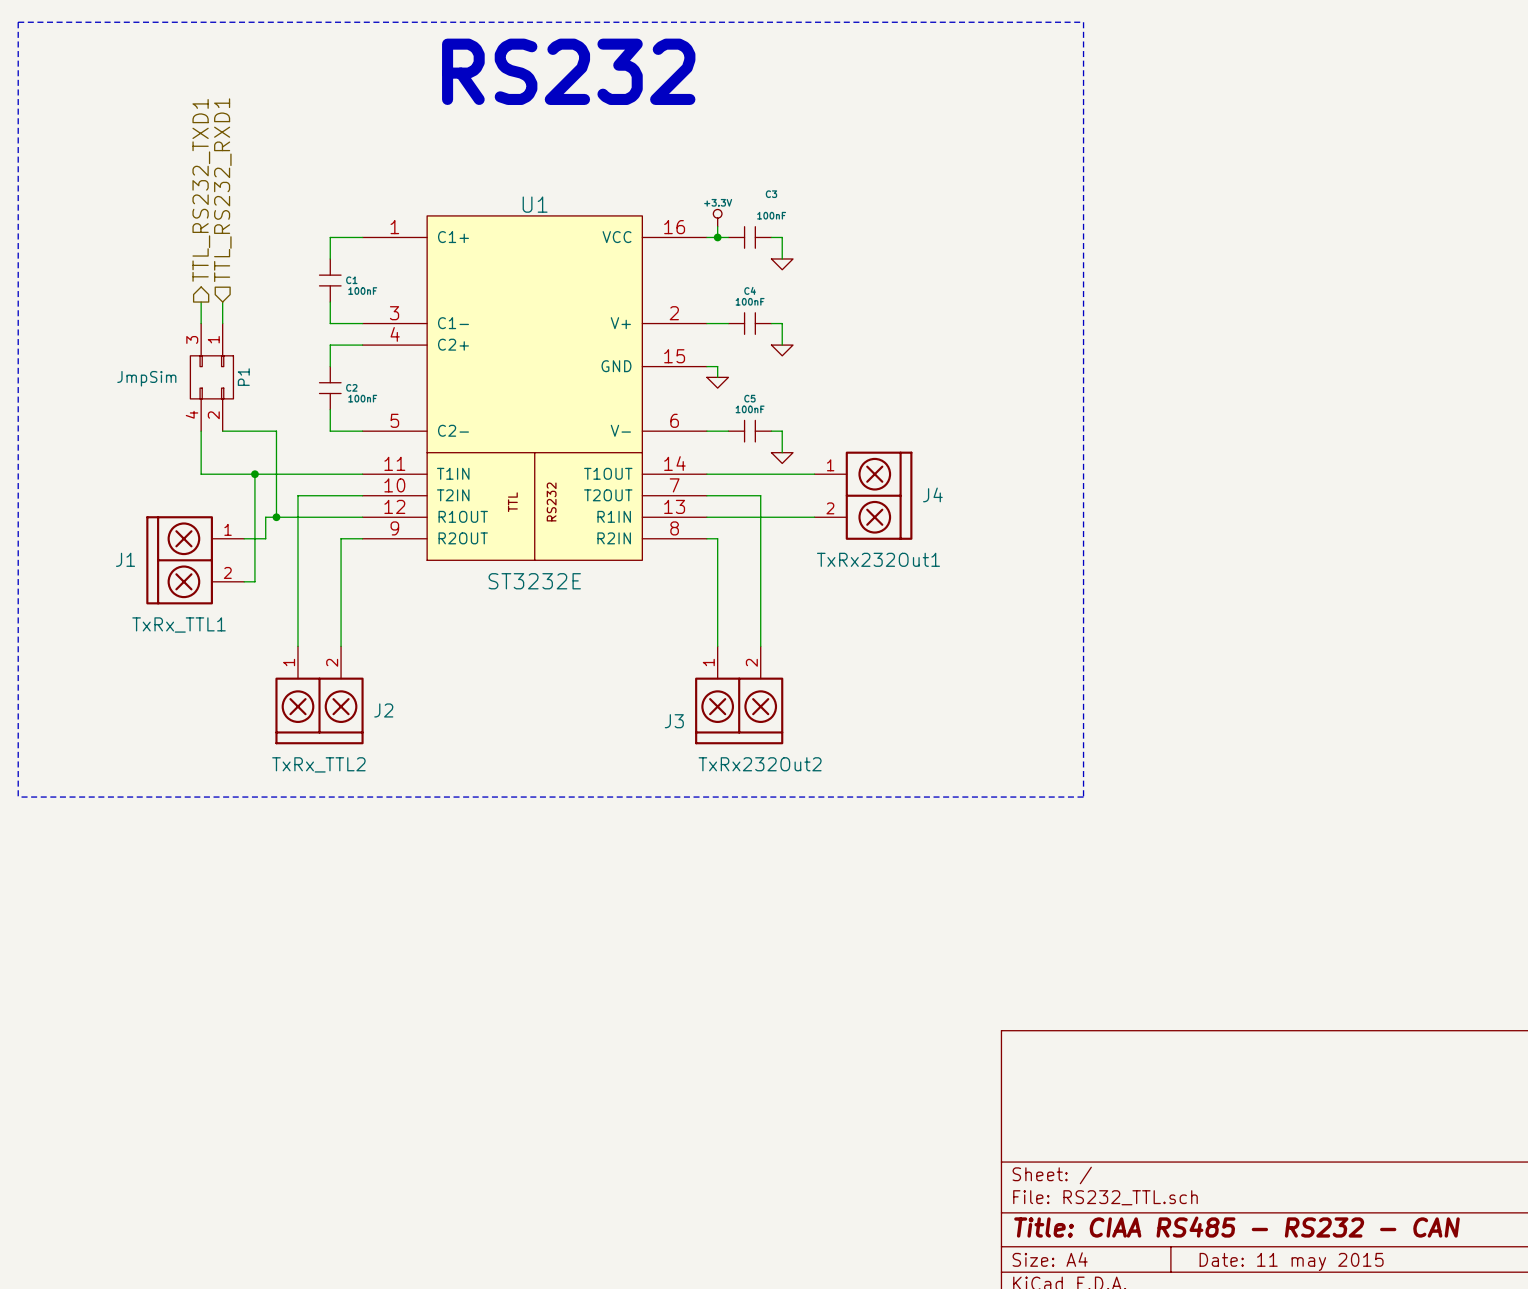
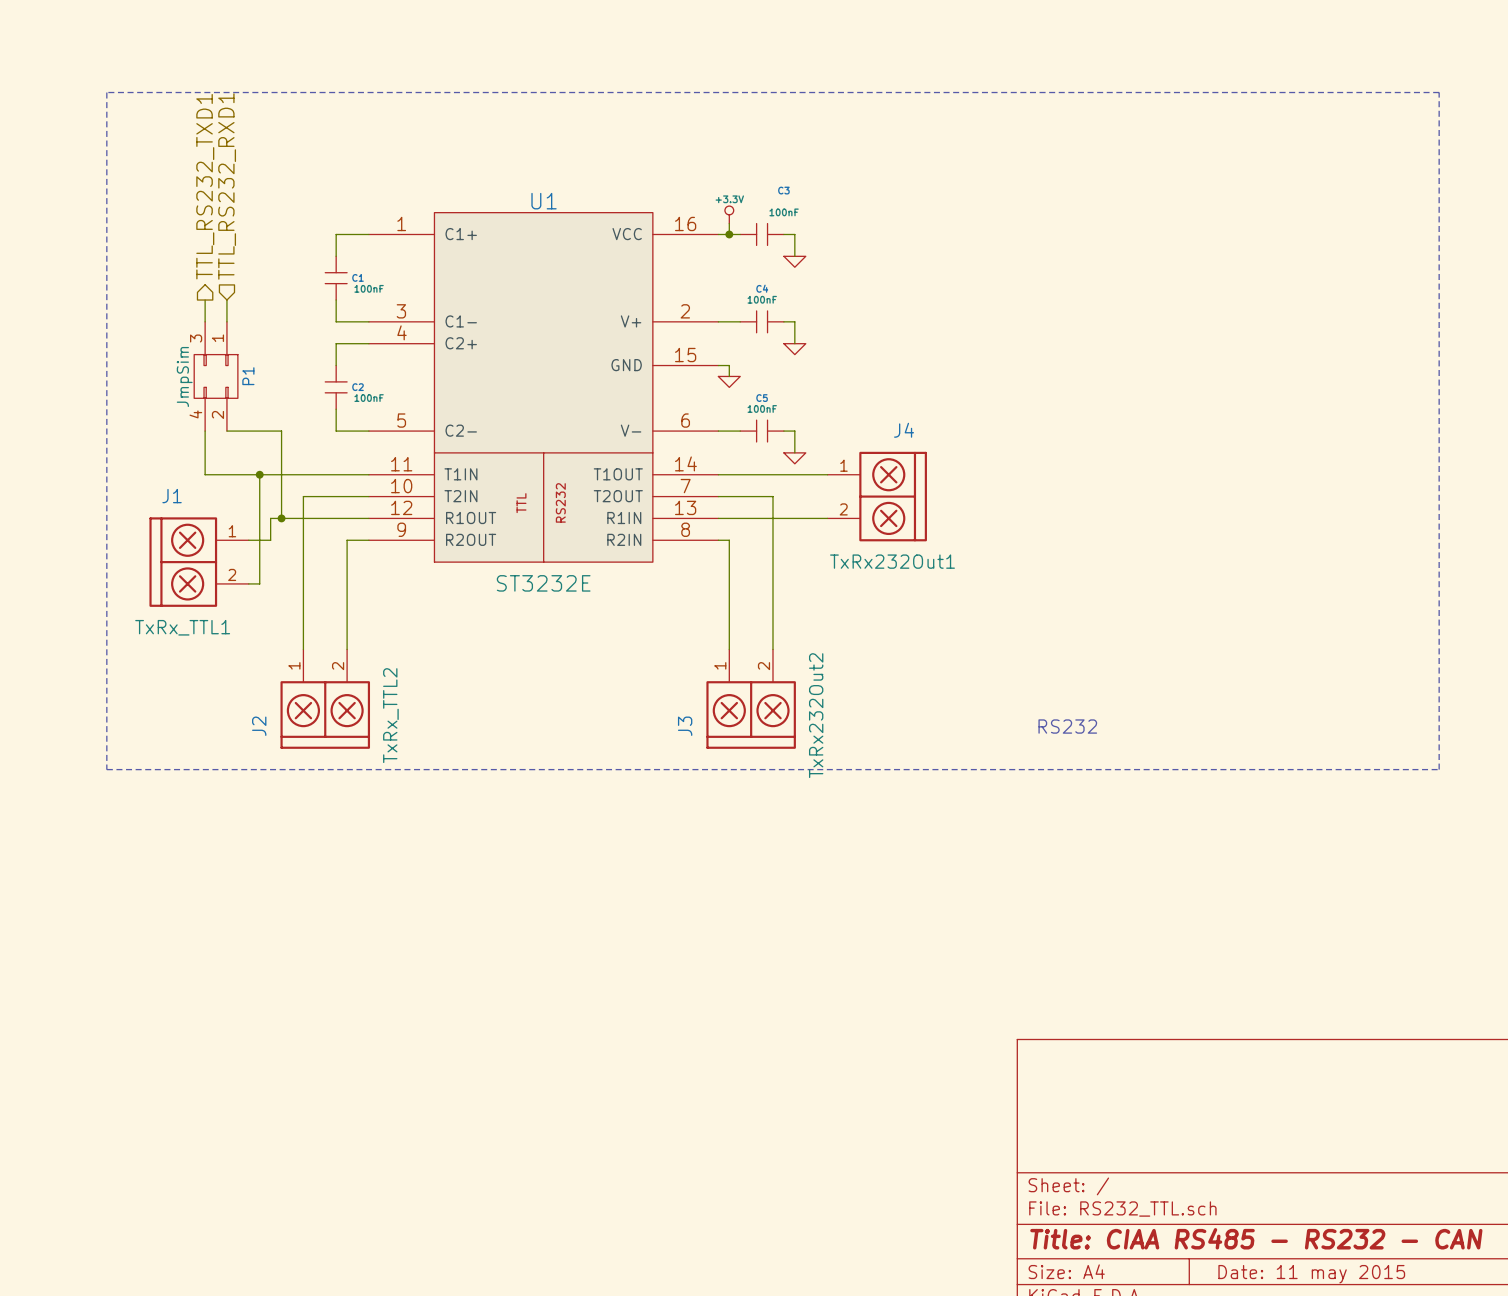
line: (18, 22) (18, 797) (1083, 797) (1083, 22) (18, 22) -> (106, 92) (106, 769) (1439, 769) (1439, 92) (106, 92)
text: RS232 (568, 71) -> none
P1 value rotation: 0° (146, 378) -> 90° counterclockwise (184, 376)
J4 name position: J4 (932, 494) -> J4 (904, 430)
J1 name position: J1 (125, 559) -> J1 (172, 496)
J2 name rotation: 0° (383, 710) -> 90° counterclockwise (259, 726)
J2 name position: J2 (383, 710) -> J2 (259, 726)
J3 name rotation: 0° (674, 721) -> 90° counterclockwise (685, 726)
text: none -> RS232 (1067, 726)
J2 value rotation: 0° (318, 764) -> 90° counterclockwise (390, 715)
J3 value rotation: 0° (760, 764) -> 90° counterclockwise (816, 715)

